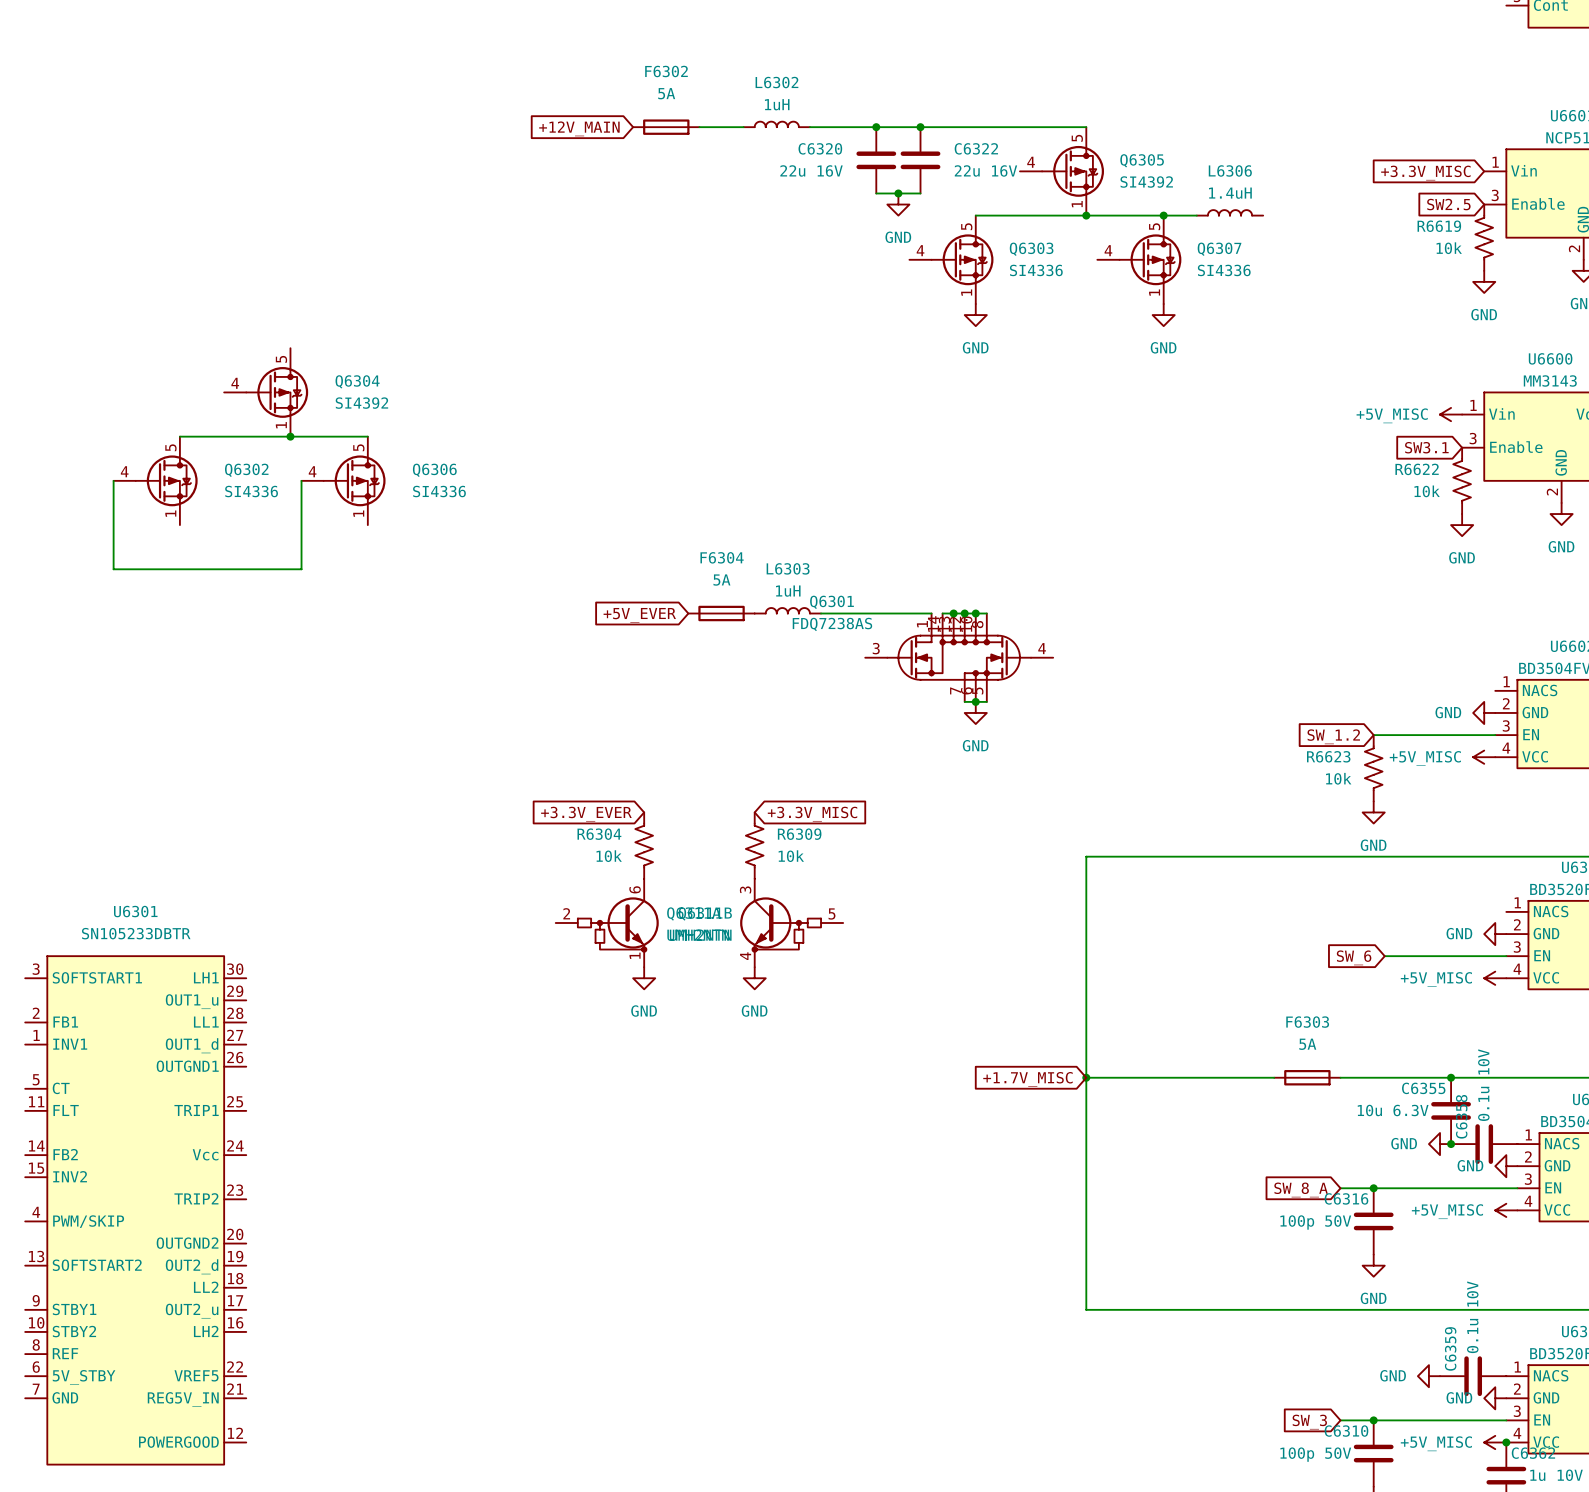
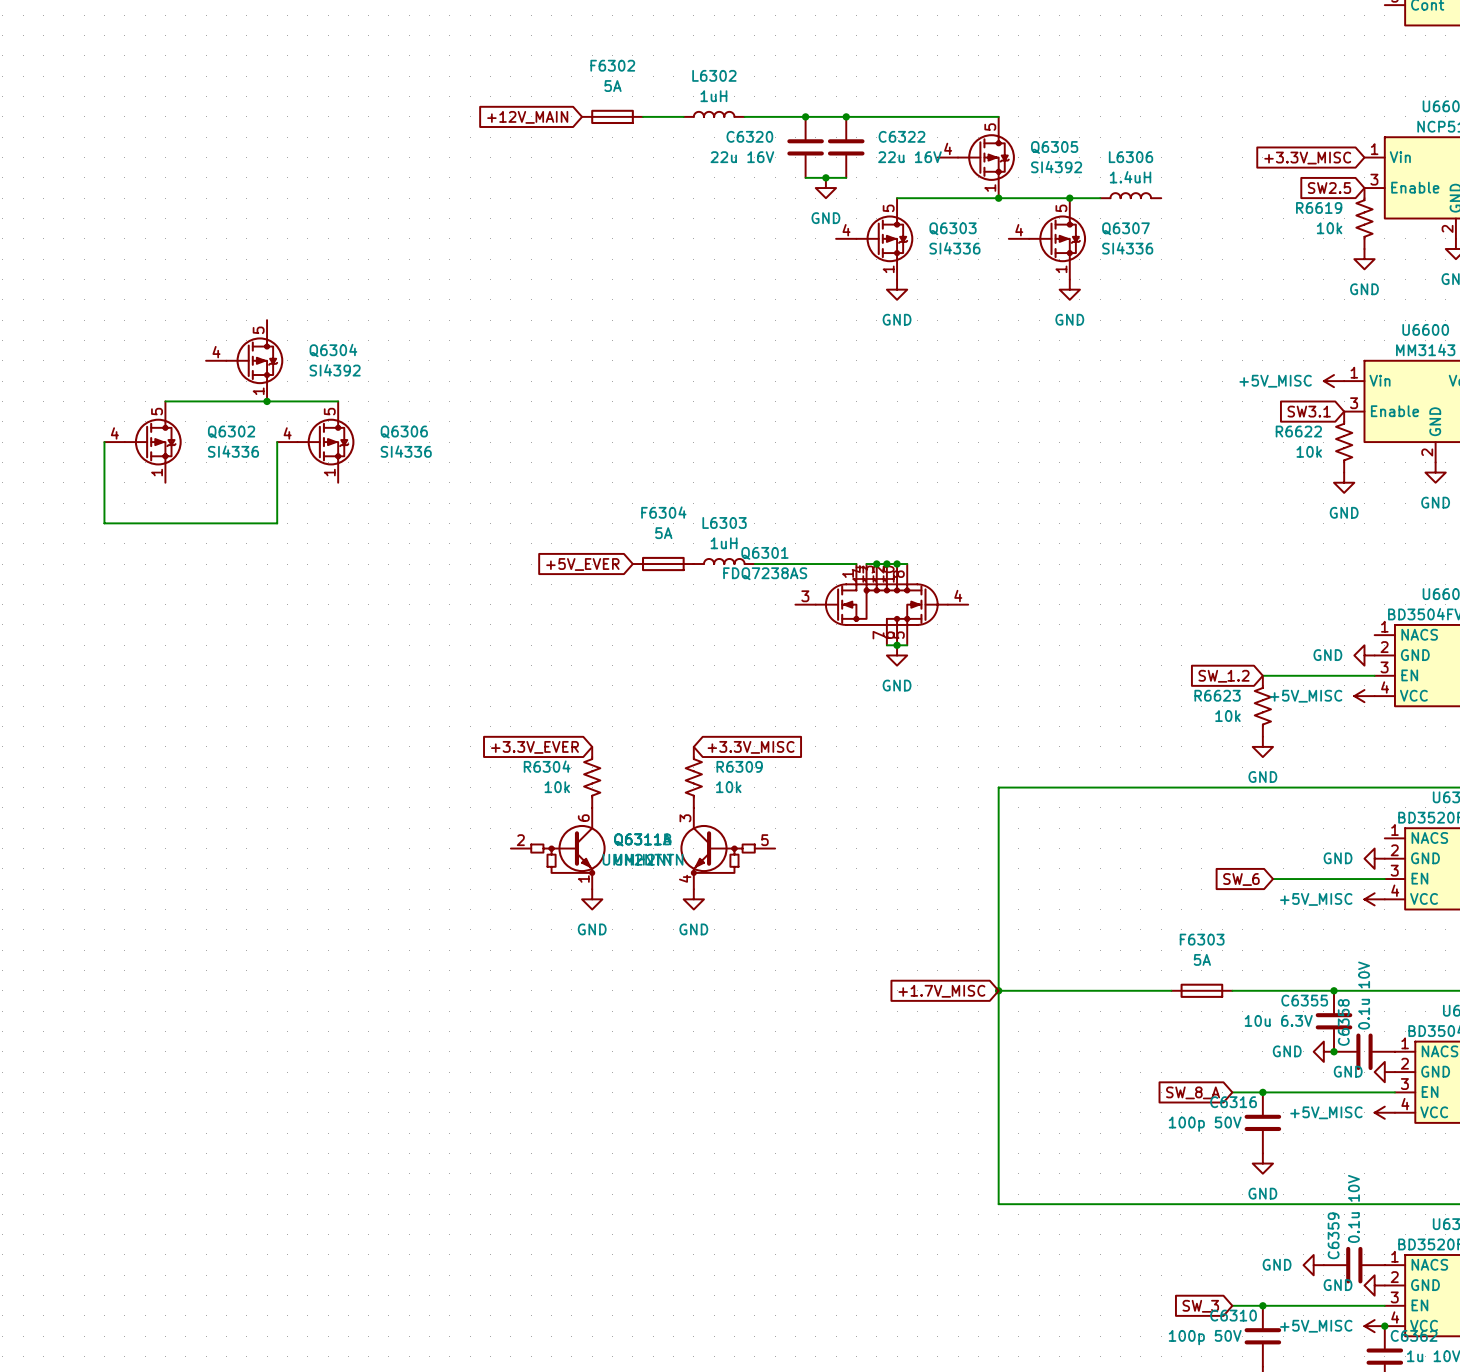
U6301: SN105233DBTR (135, 1210) -> none

